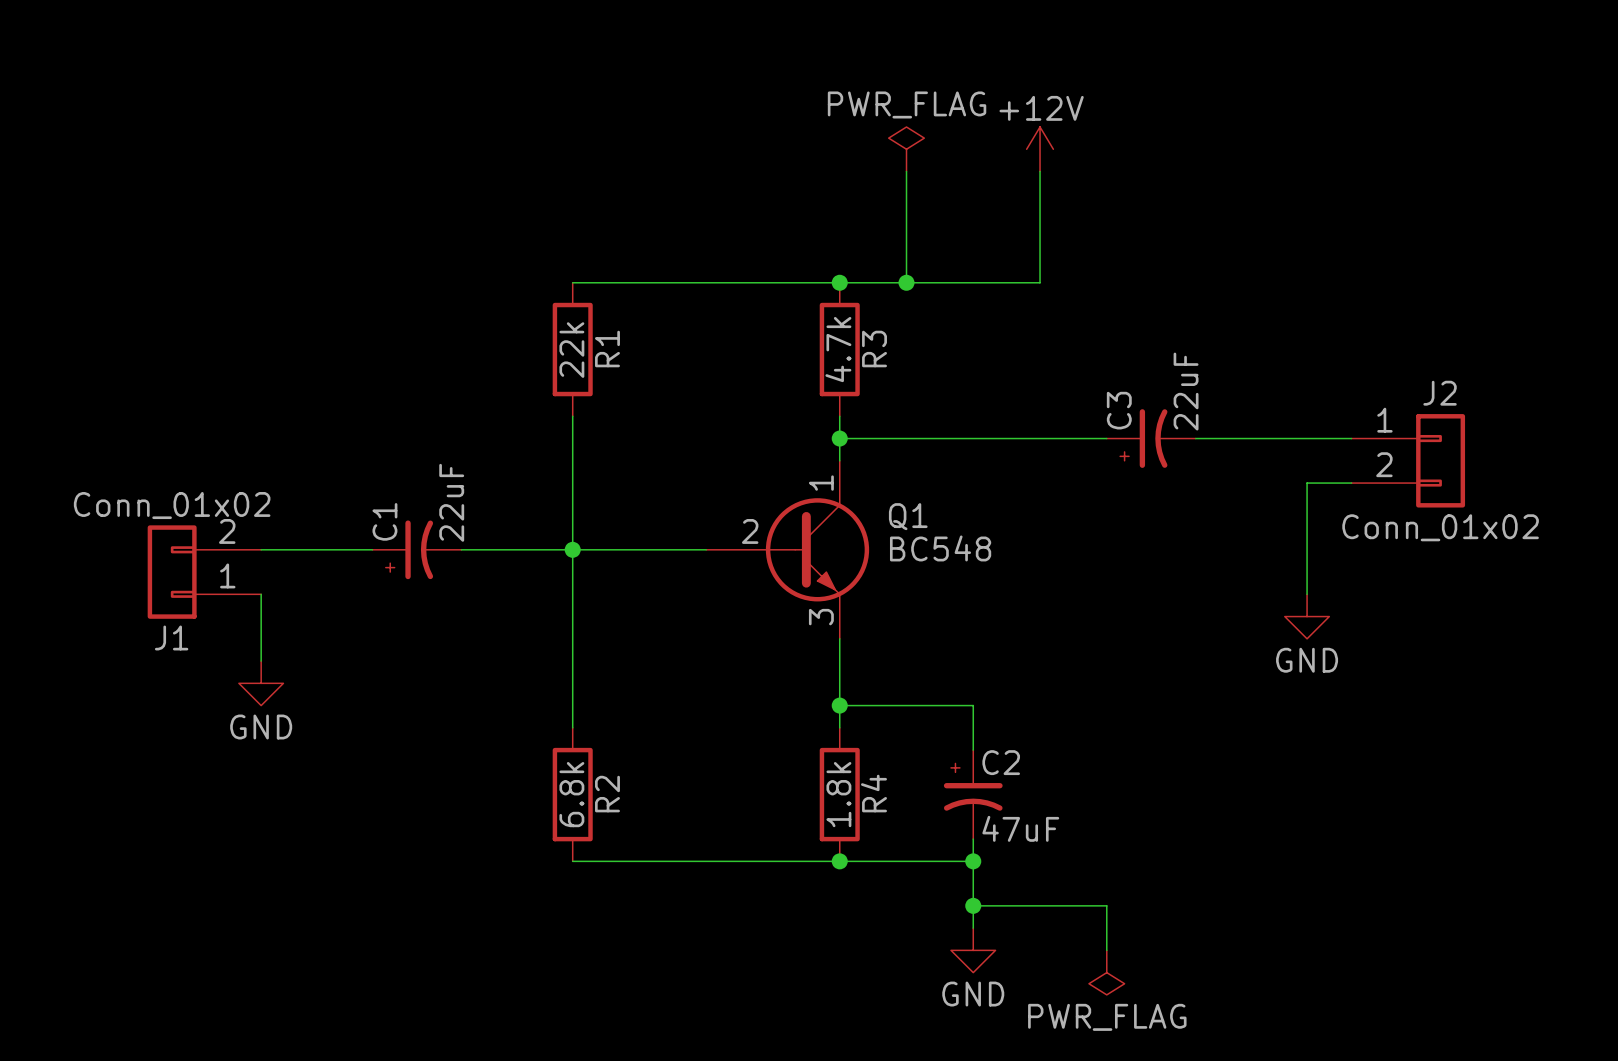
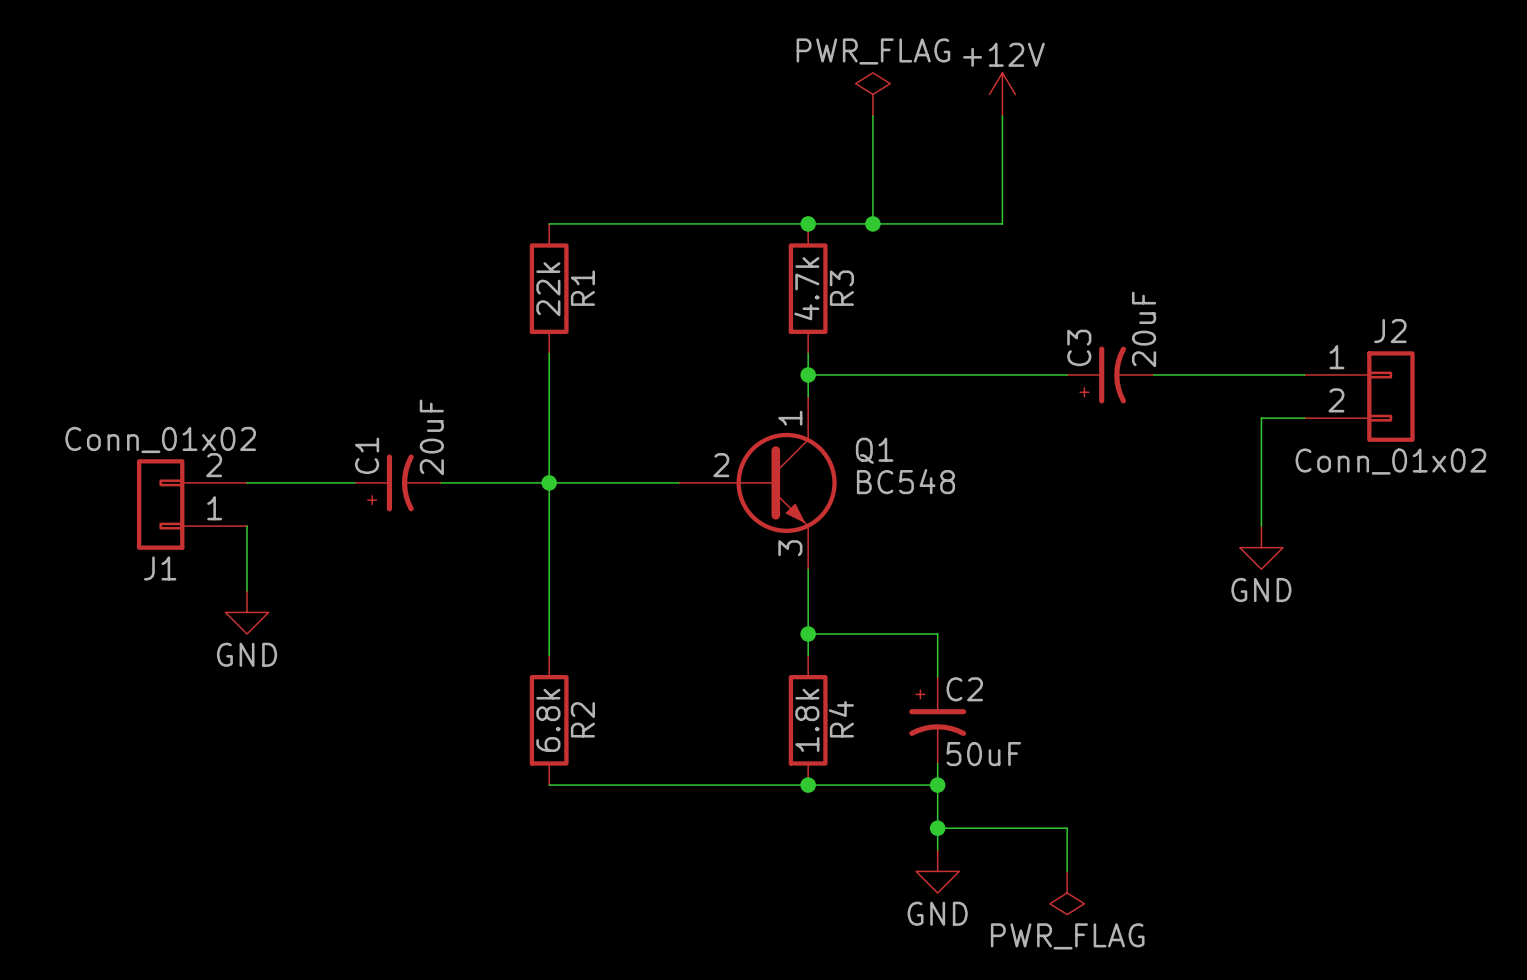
C3 value: 22uF (1186, 391) -> 20uF (1144, 329)
C1 value: 22uF (451, 502) -> 20uF (431, 437)
C2 value: 47uF (1020, 828) -> 50uF (983, 754)

